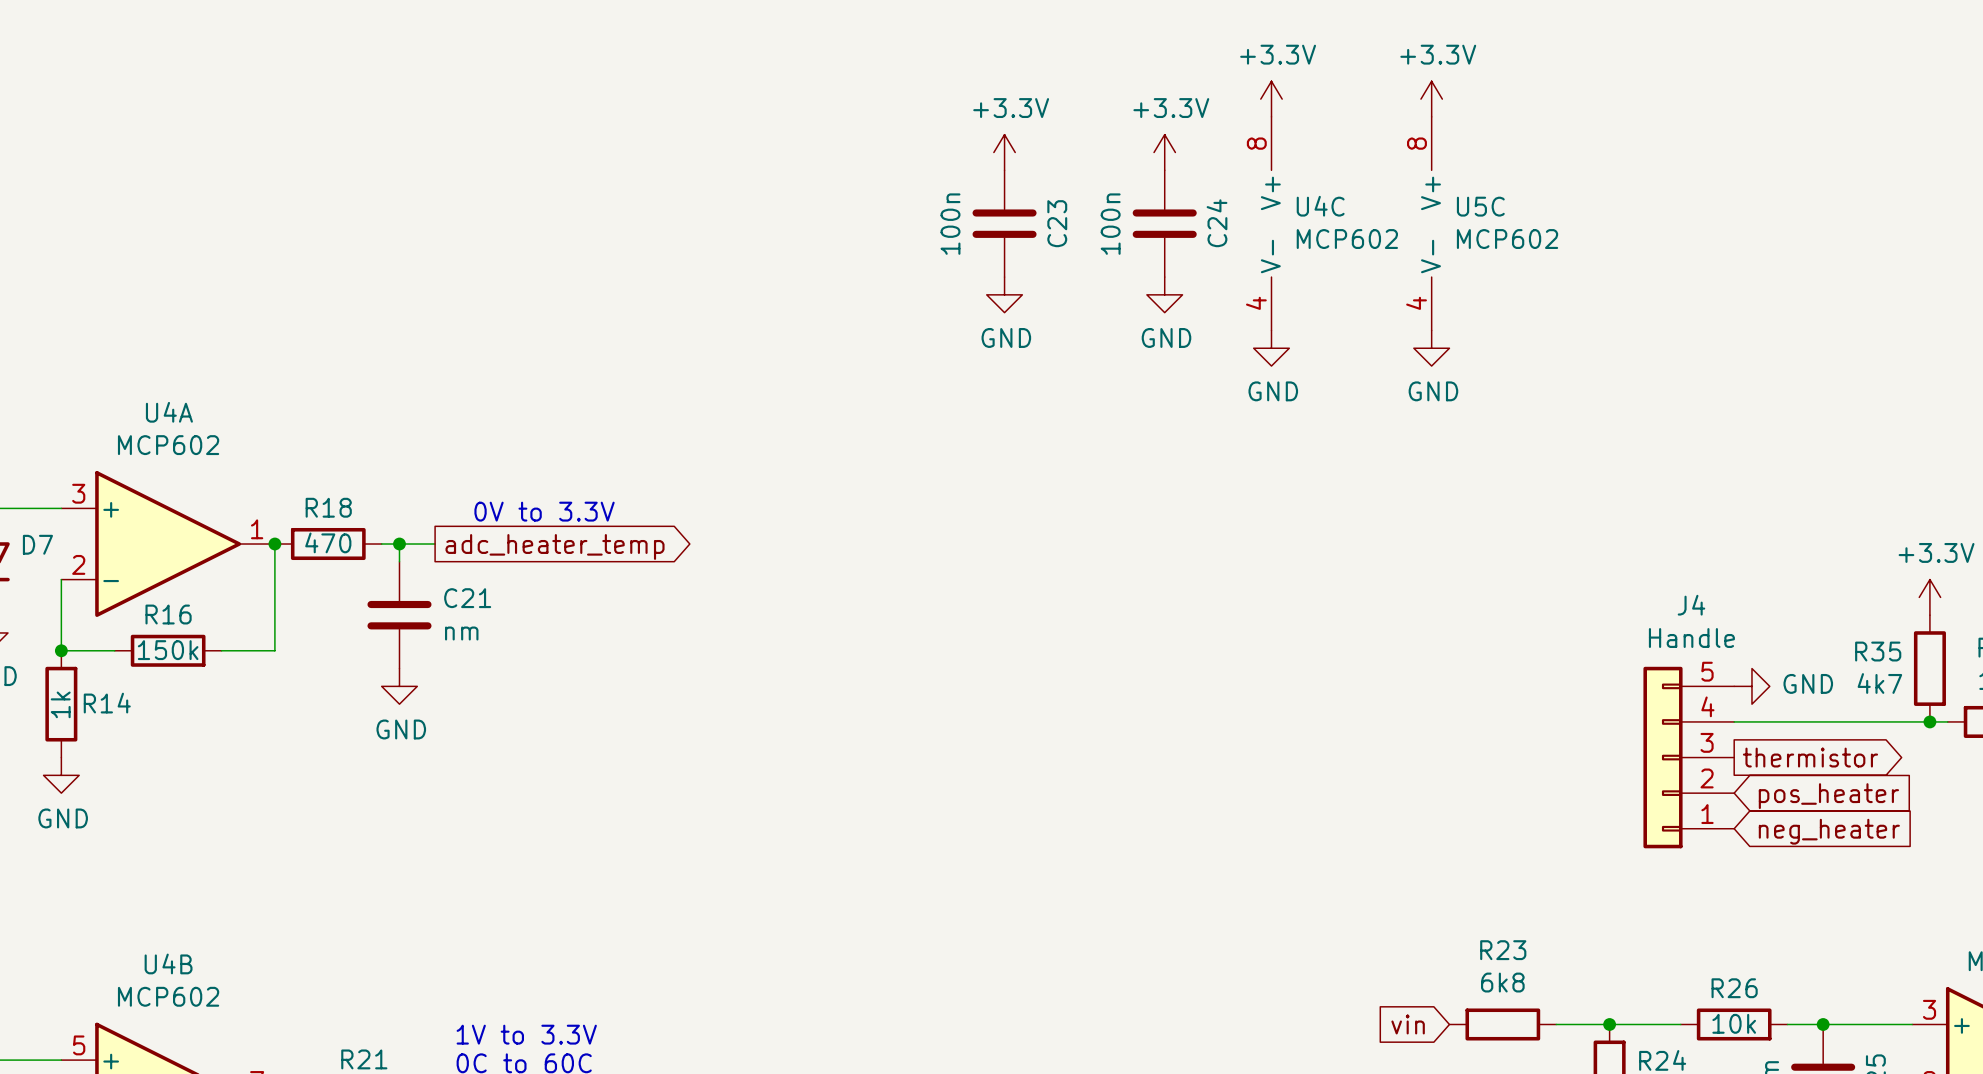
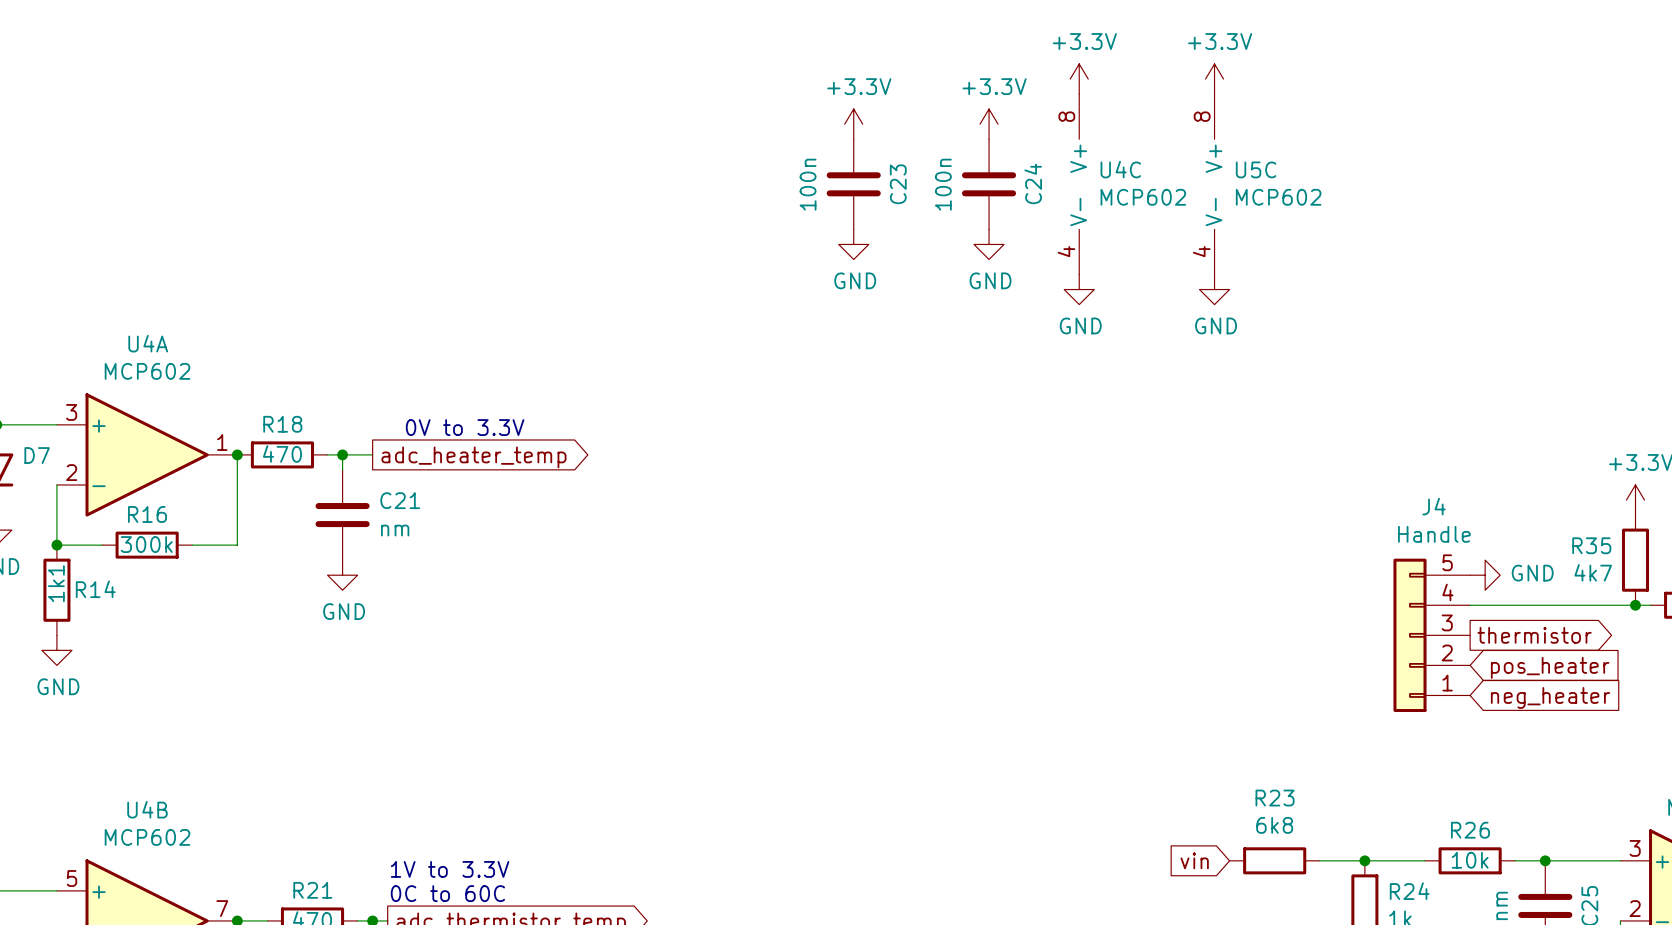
R16 value: 150k (168, 650) -> 300k (146, 544)
R14 value: 1k (60, 704) -> 1k1 (56, 583)

